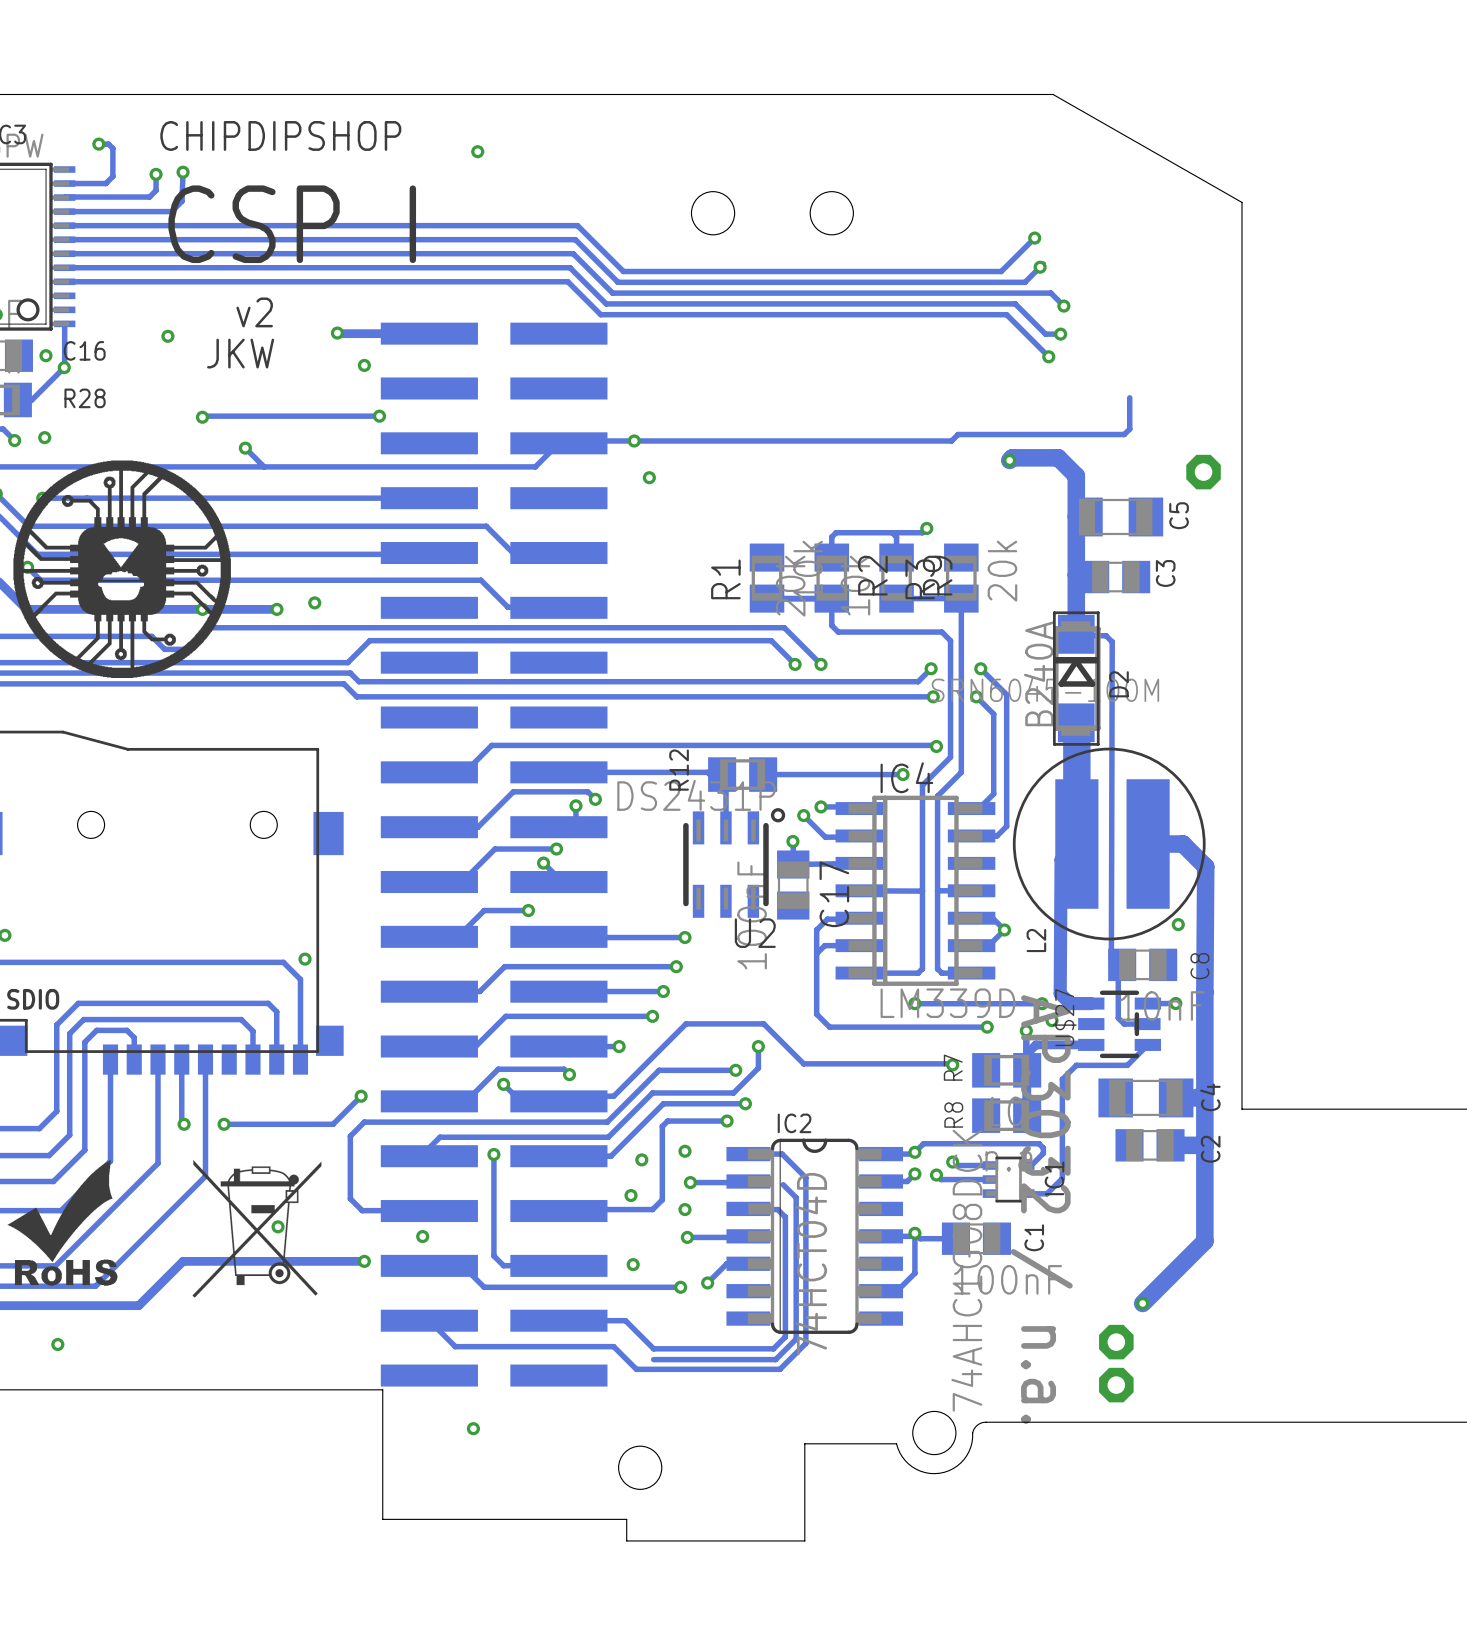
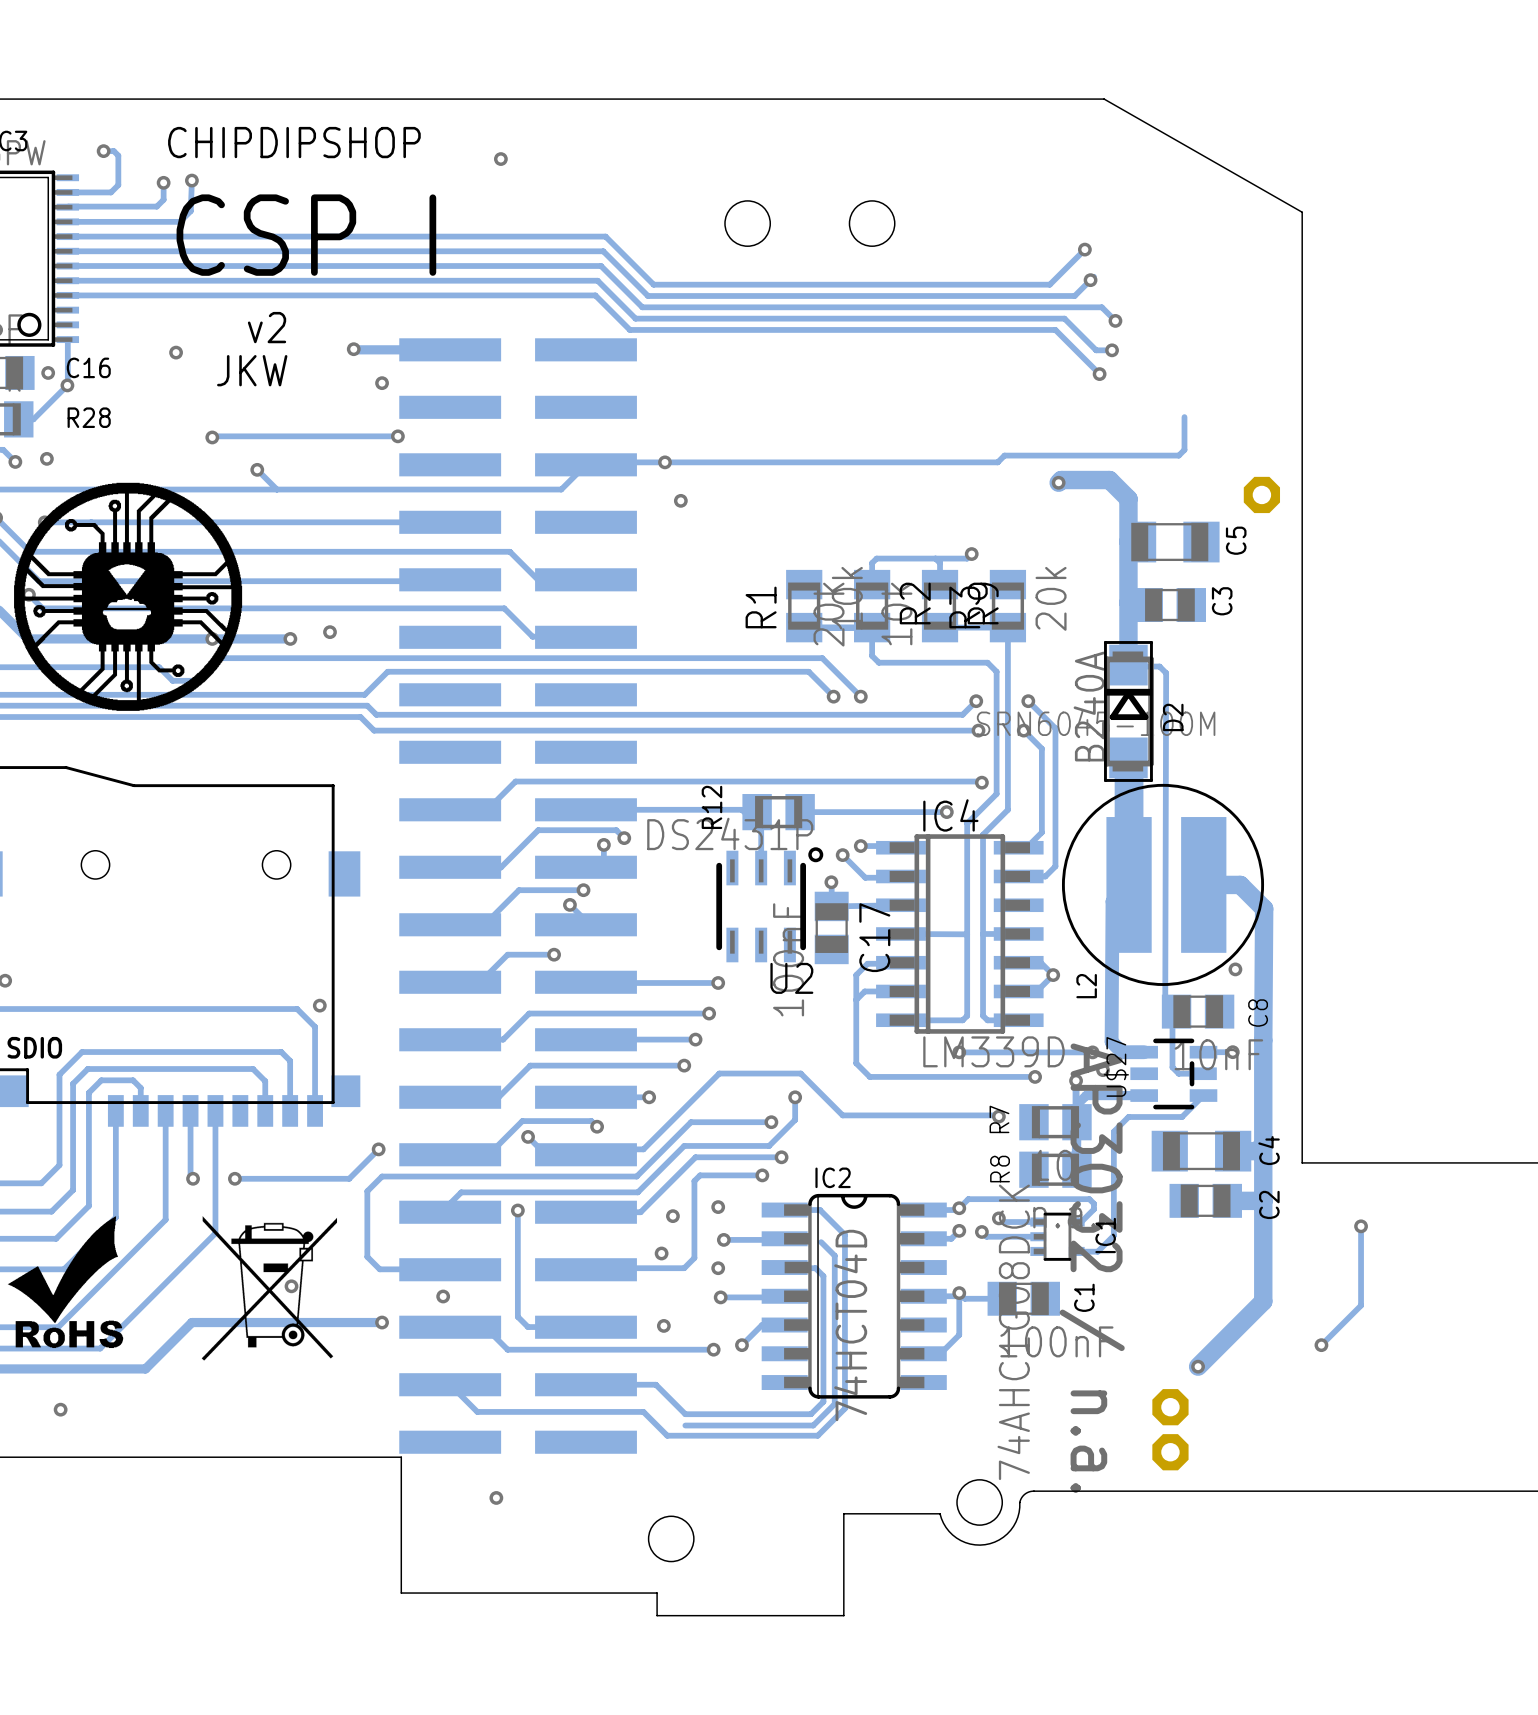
track: none -> (1361, 1226) (1361, 1305) (1321, 1345)
via: none -> (1361, 1226)
via: none -> (1321, 1345)

